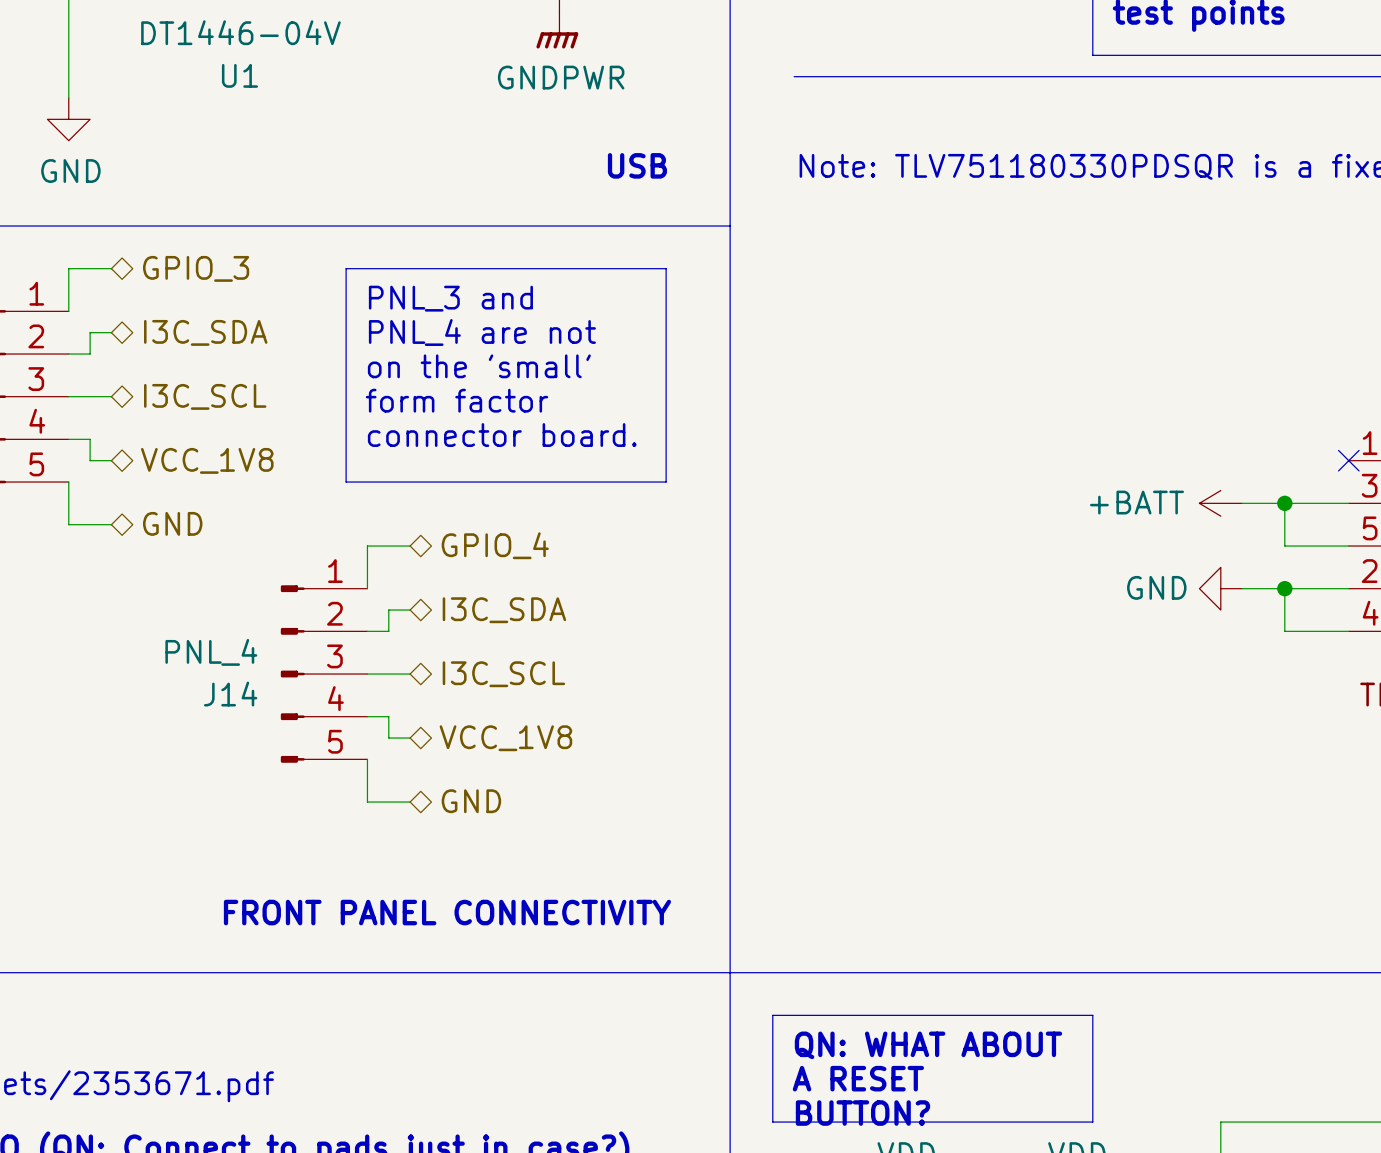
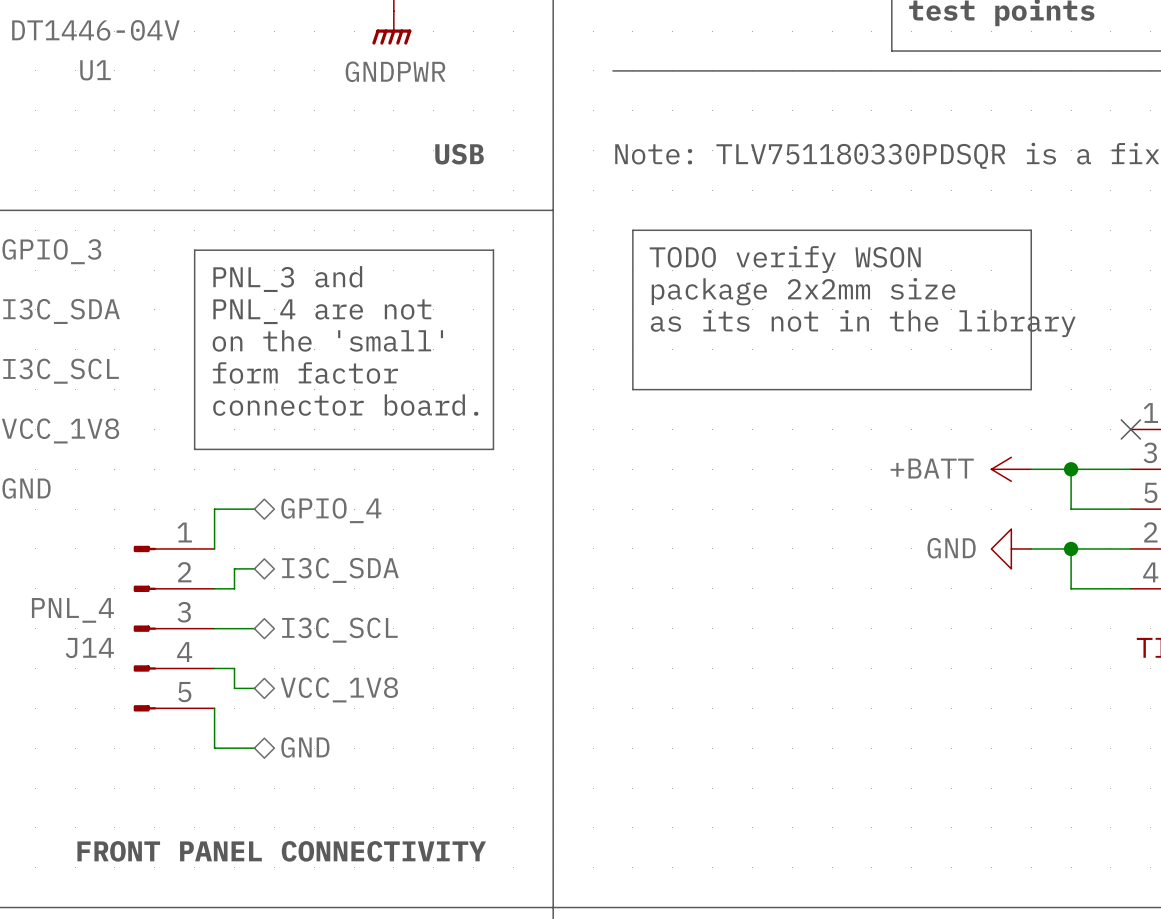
line: none -> (632, 230) (1031, 230) (1031, 389) (632, 389) (632, 230)
text: none -> TODO verify WSON (785, 259)
text: none -> package 2x2mm size (803, 291)
text: none -> as its not in the library (863, 323)

